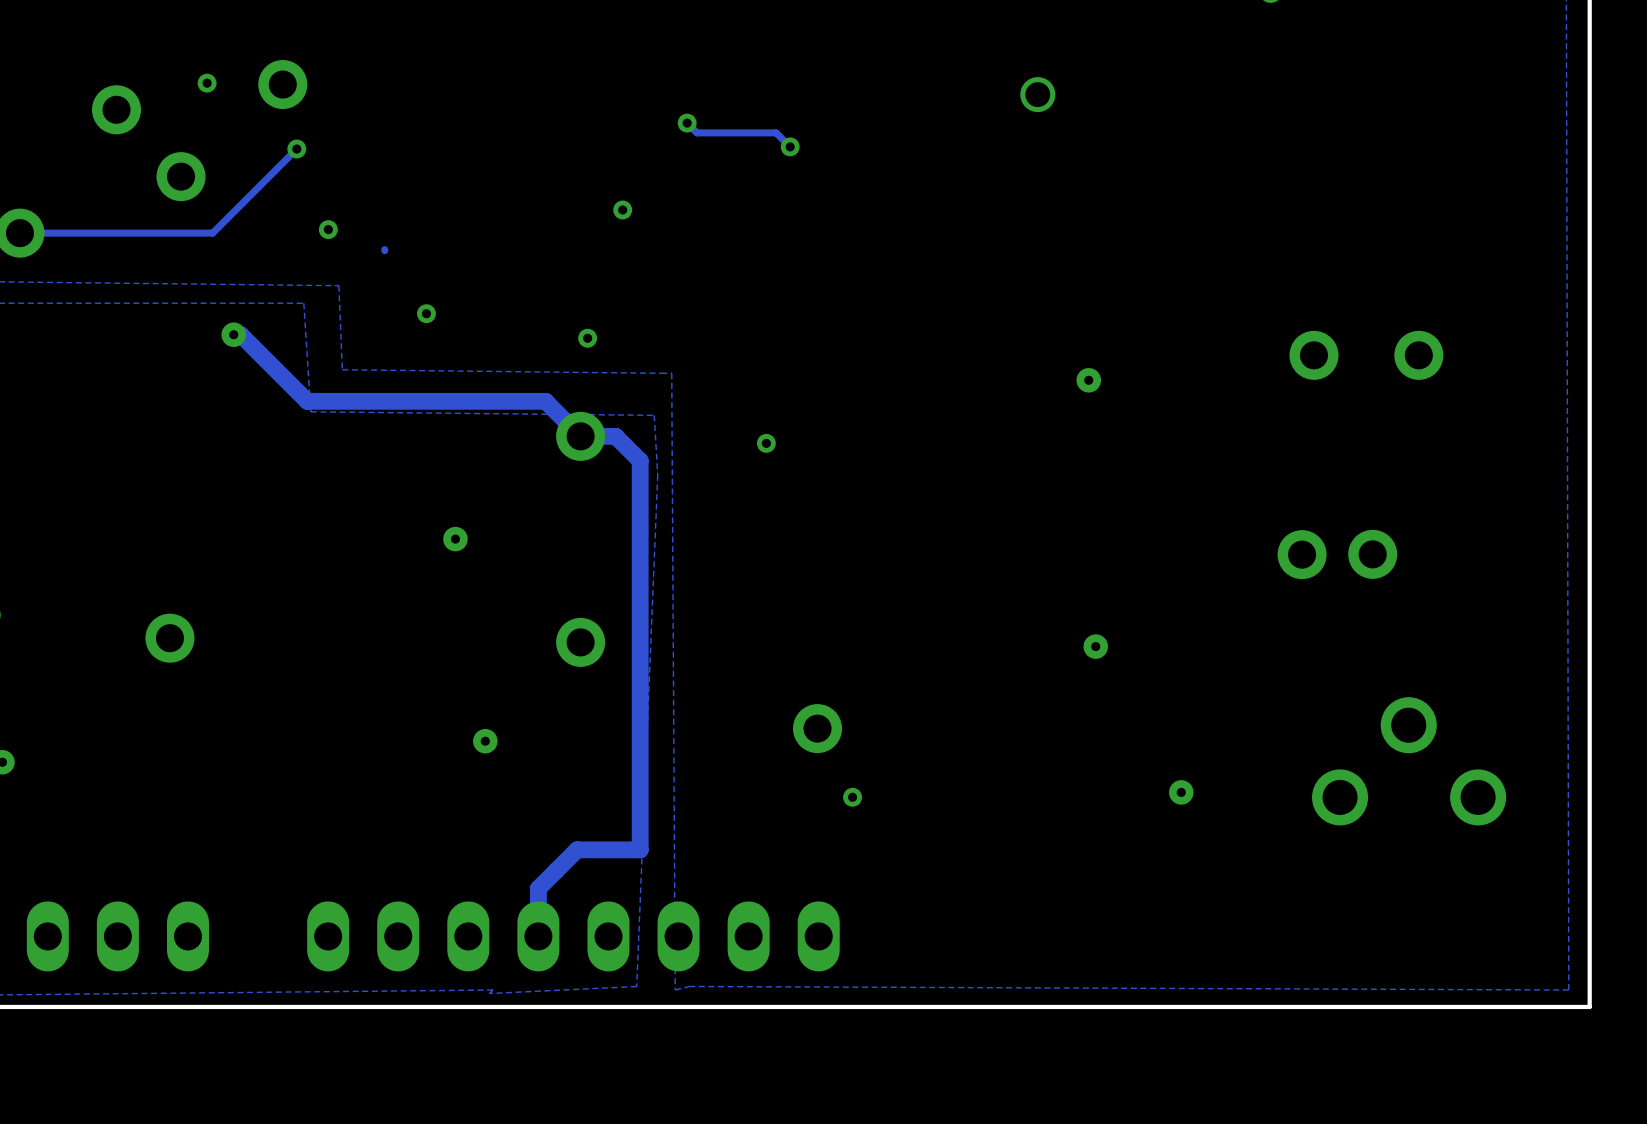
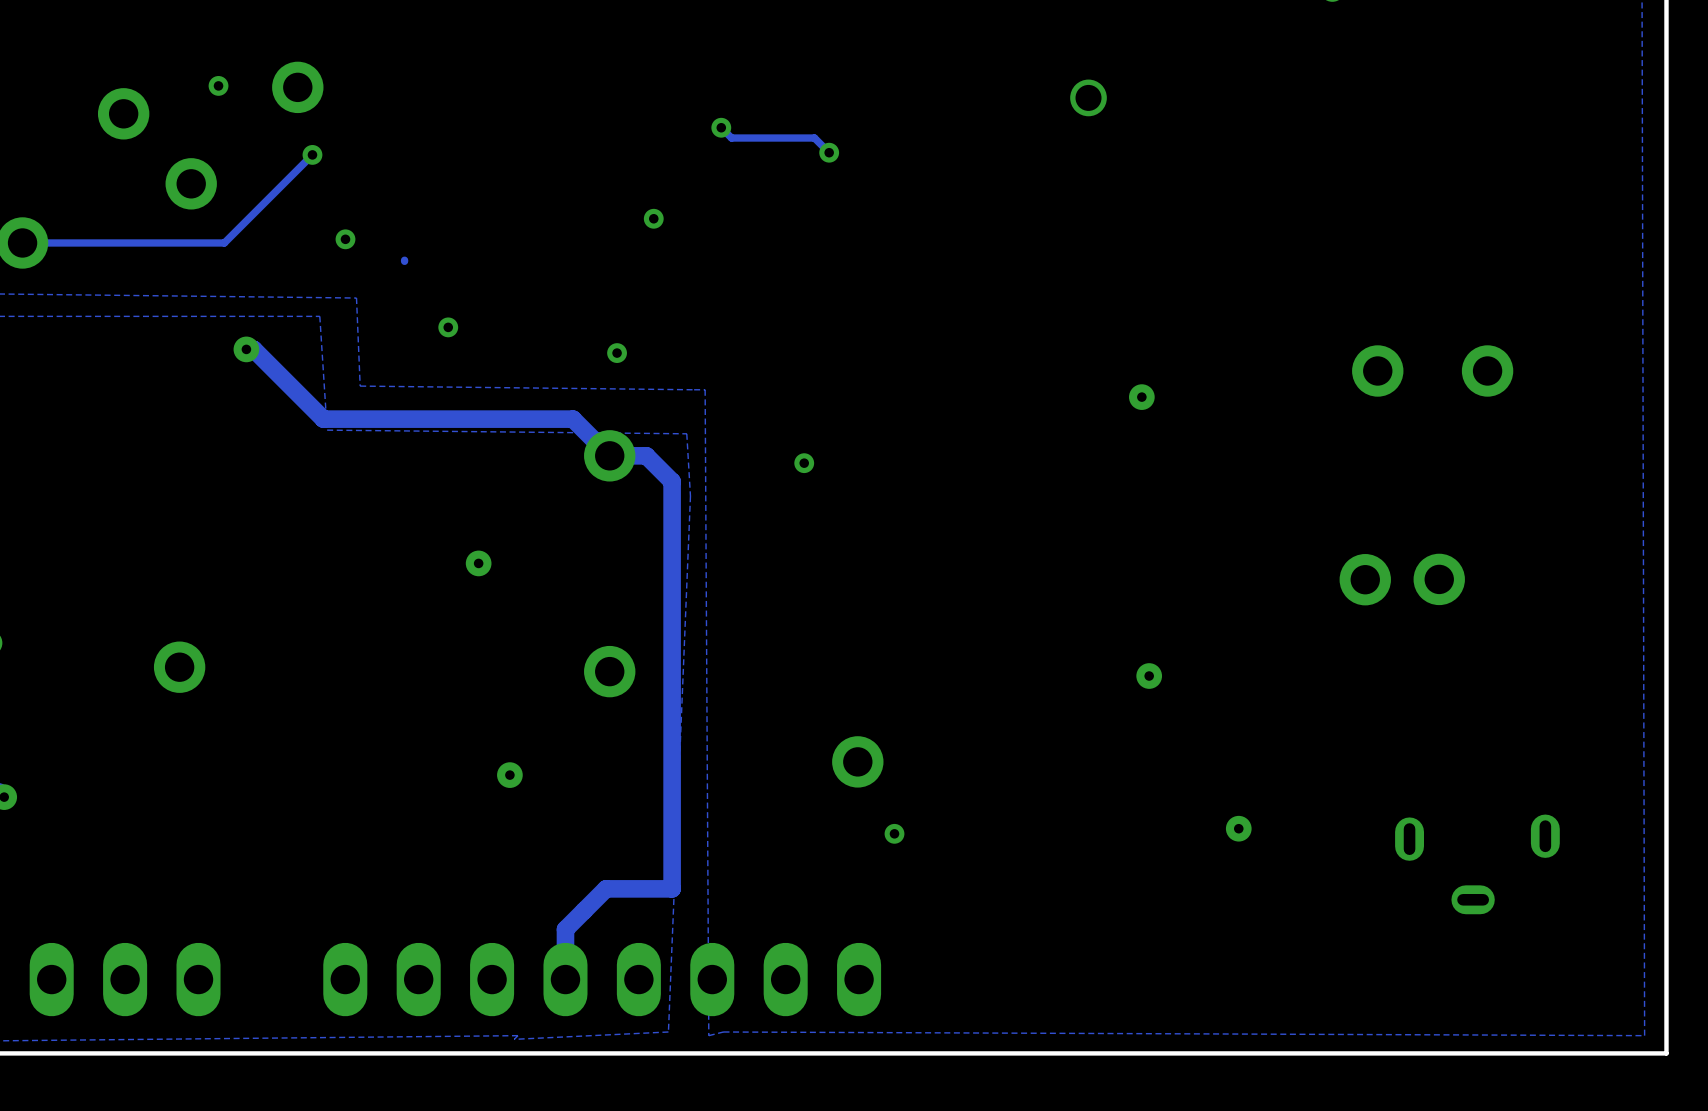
part: (1409, 761) -> none
part: none -> (1477, 864)

